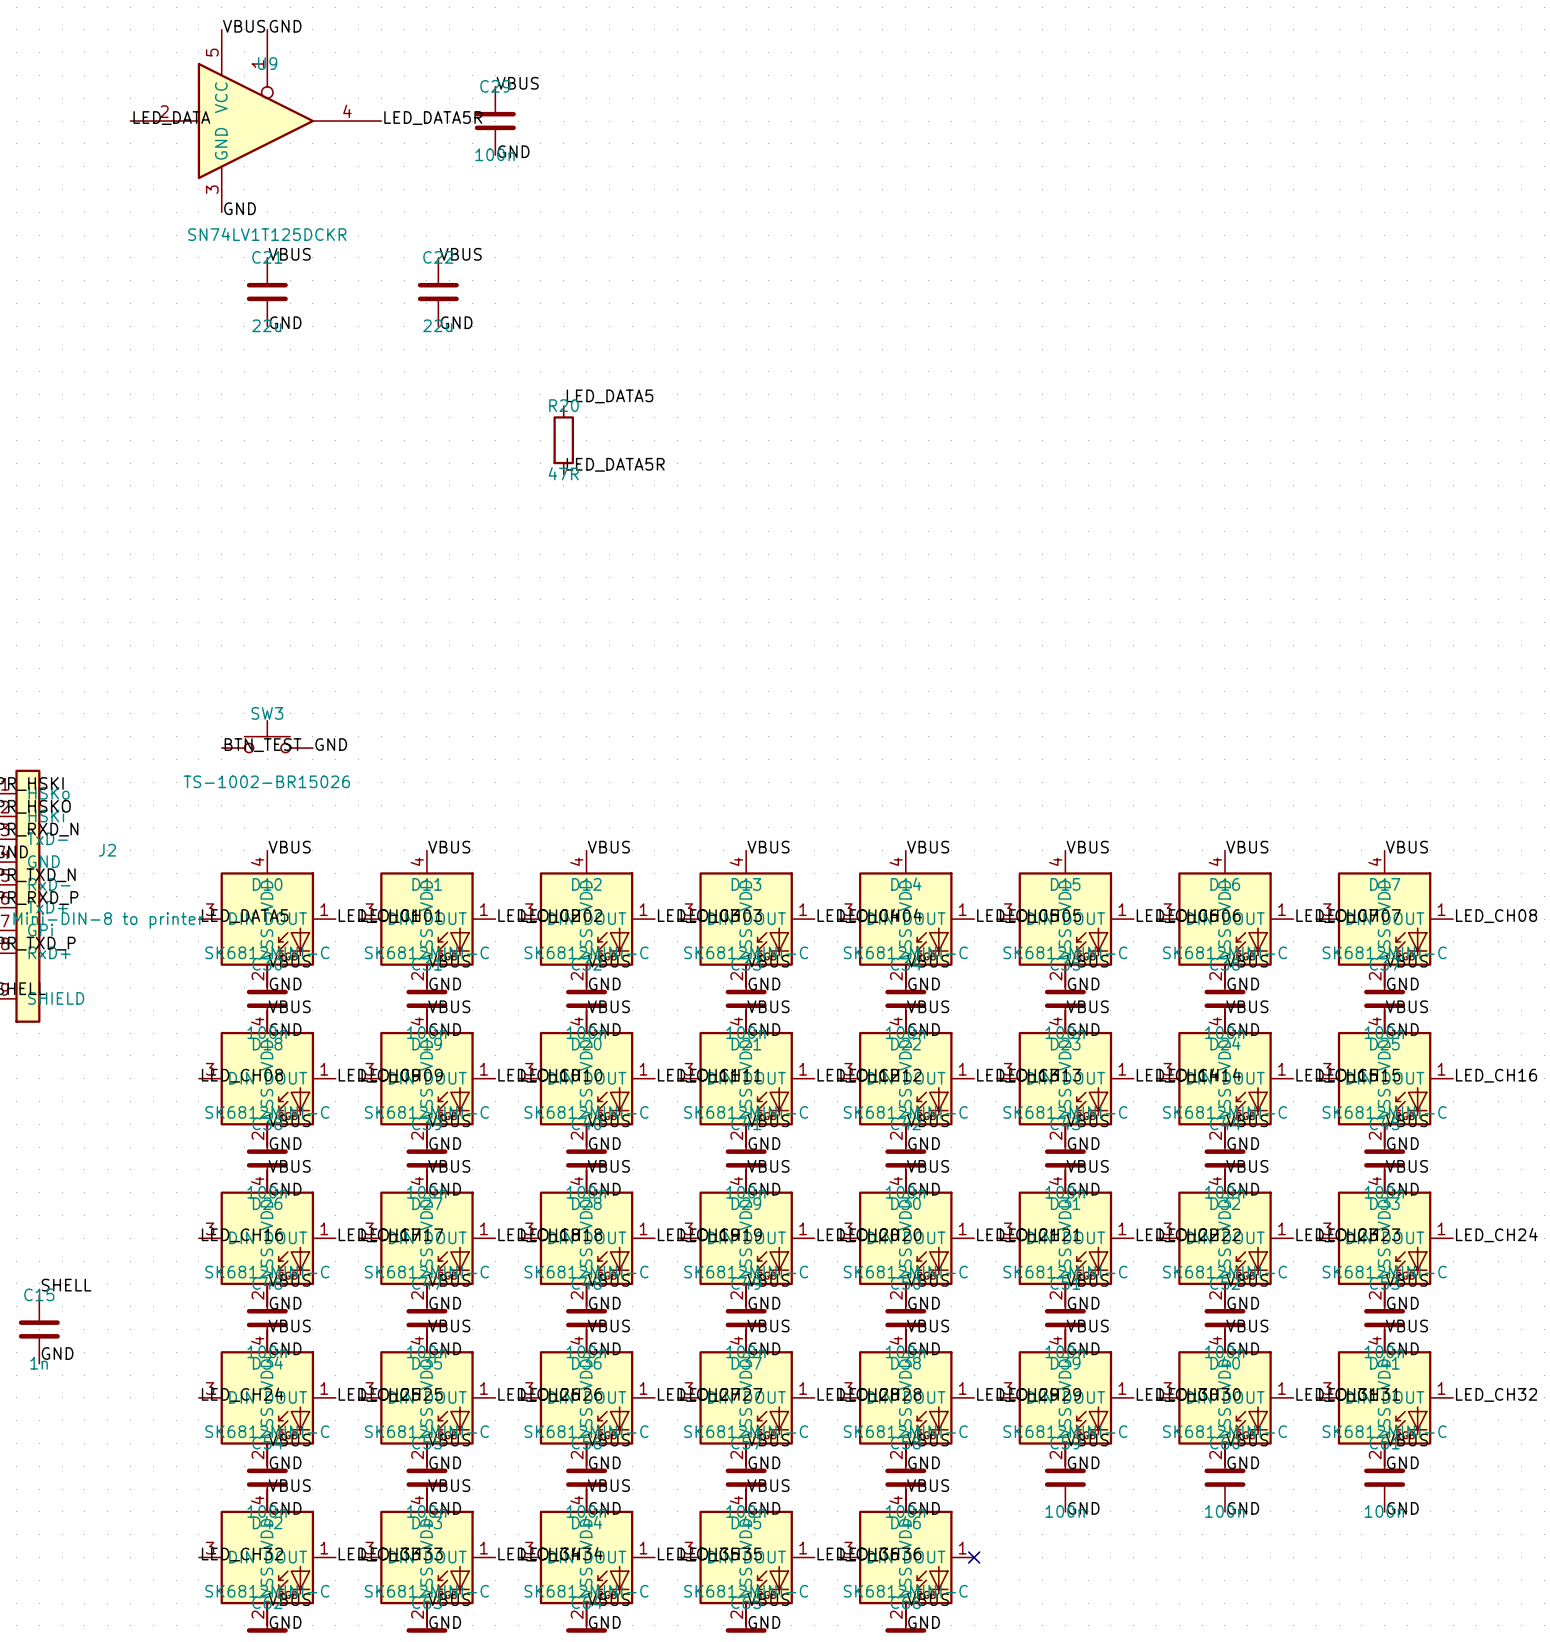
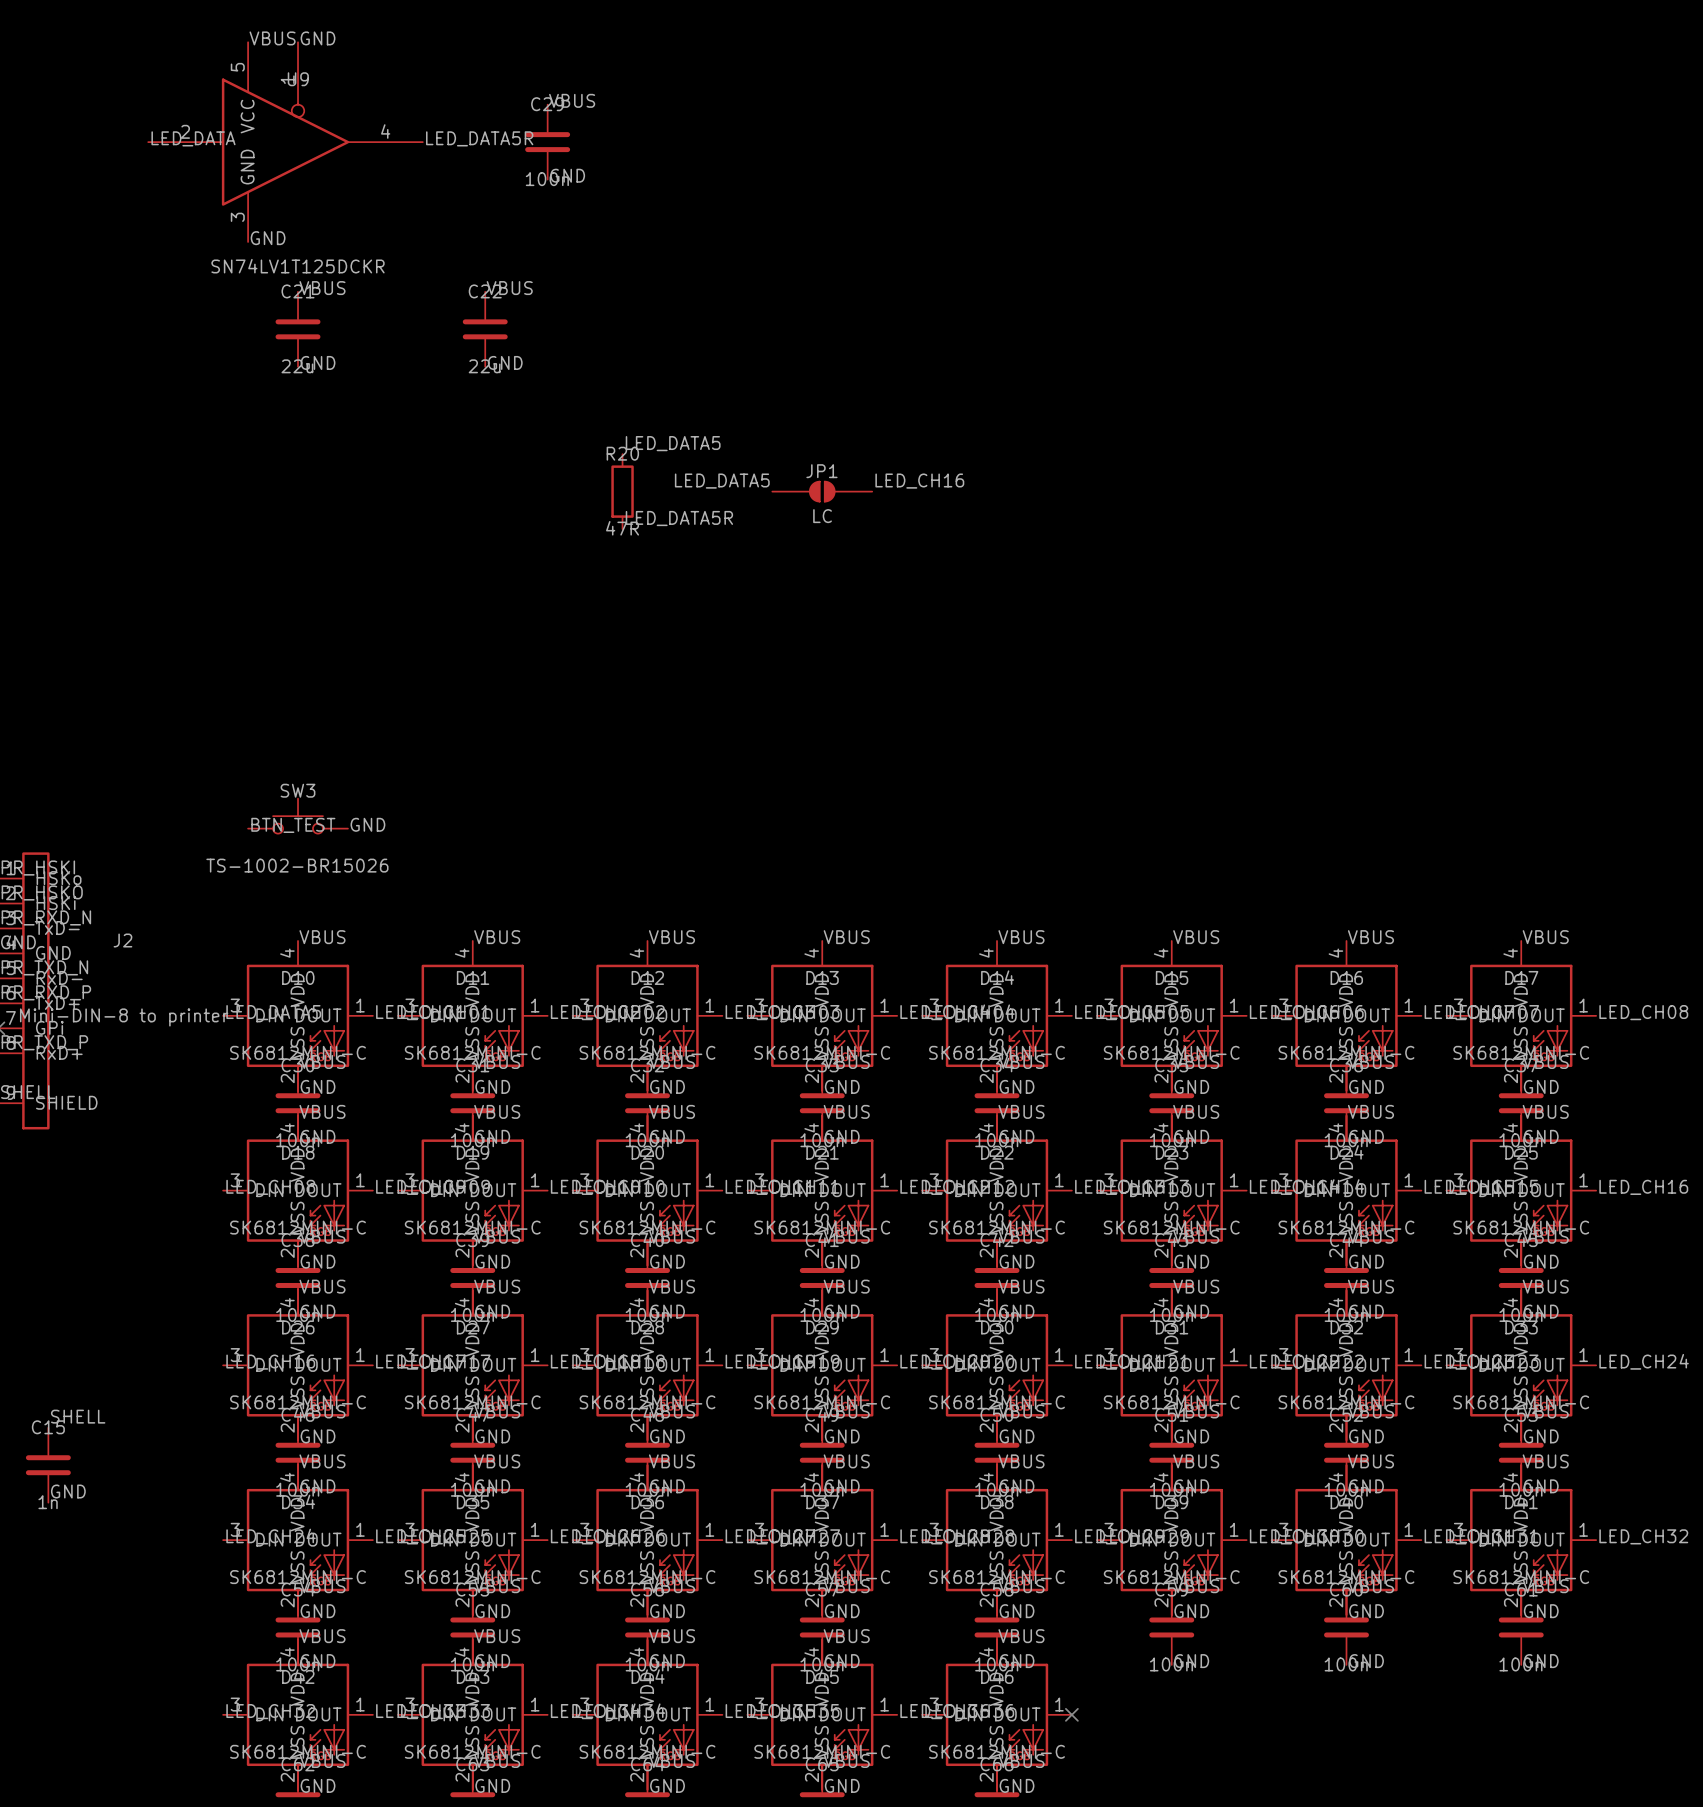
label: none -> LED_DATA5 (722, 481)
label: none -> LED_CH16 (919, 481)
JP1: none -> LC (822, 491)

